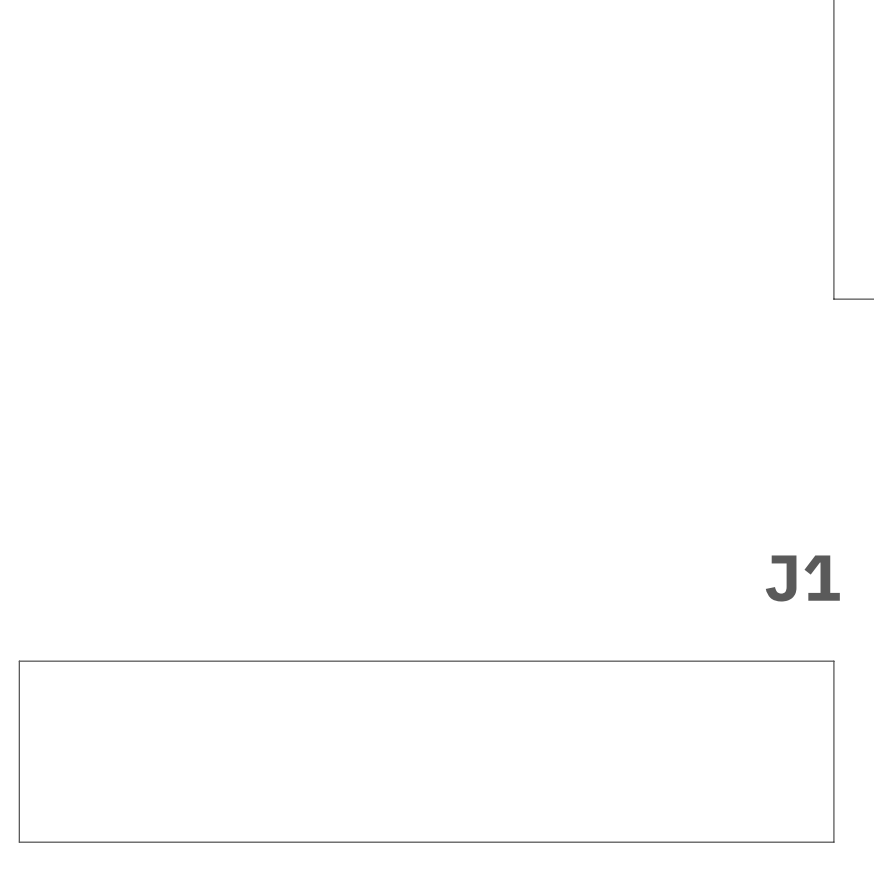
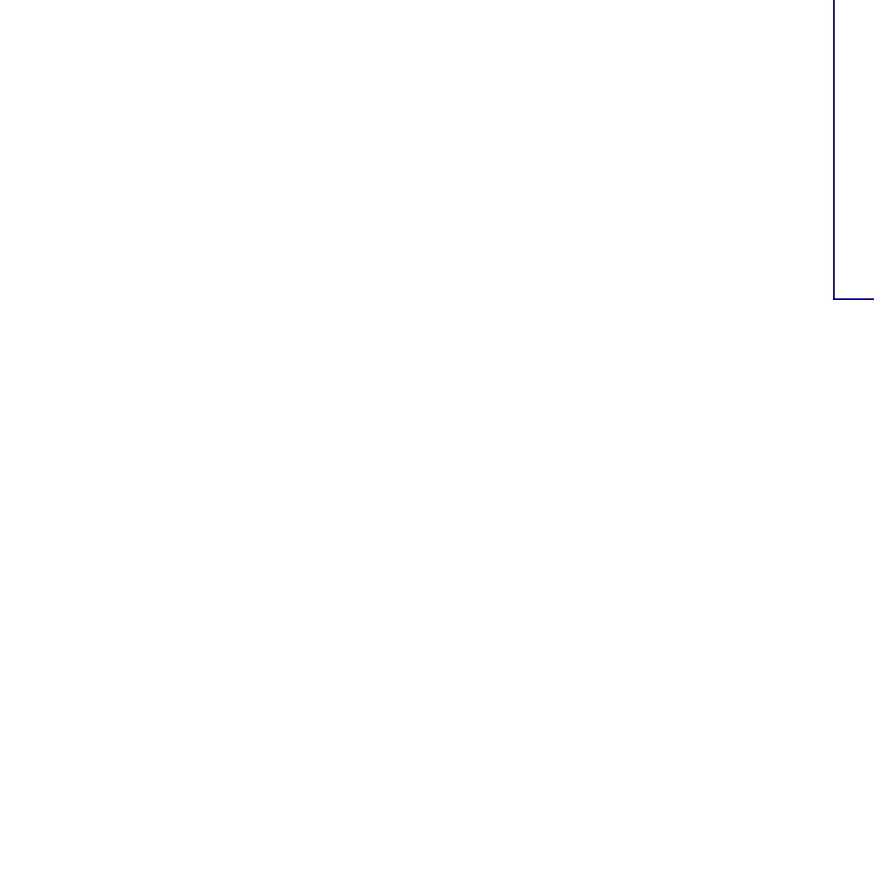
text: J1 (802, 578) -> none
line: (19, 661) (833, 661) (833, 842) (19, 842) (19, 661) -> none

